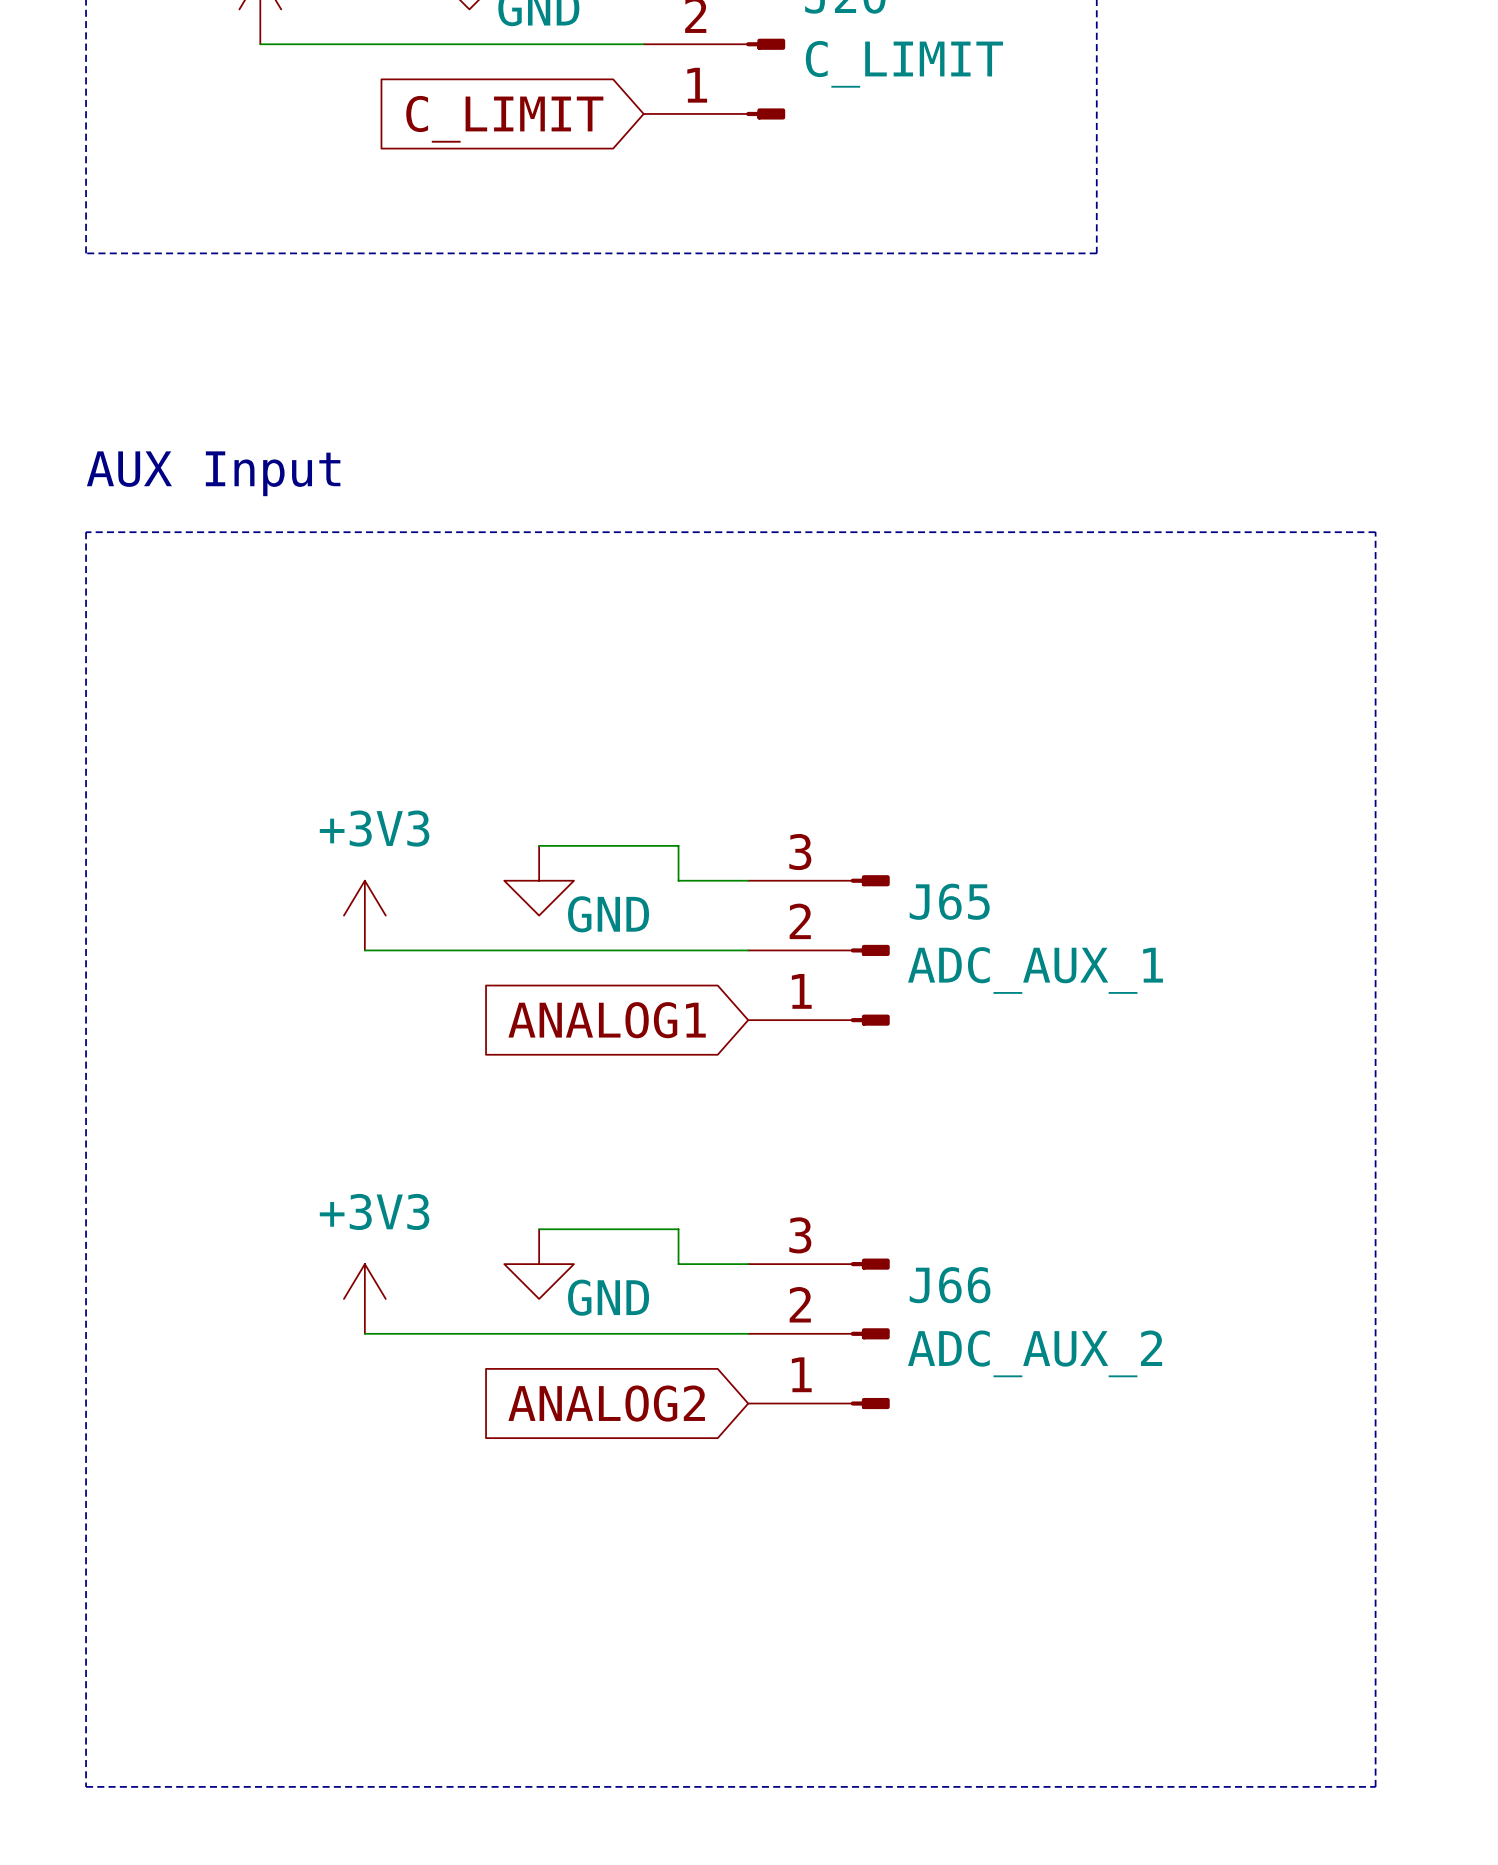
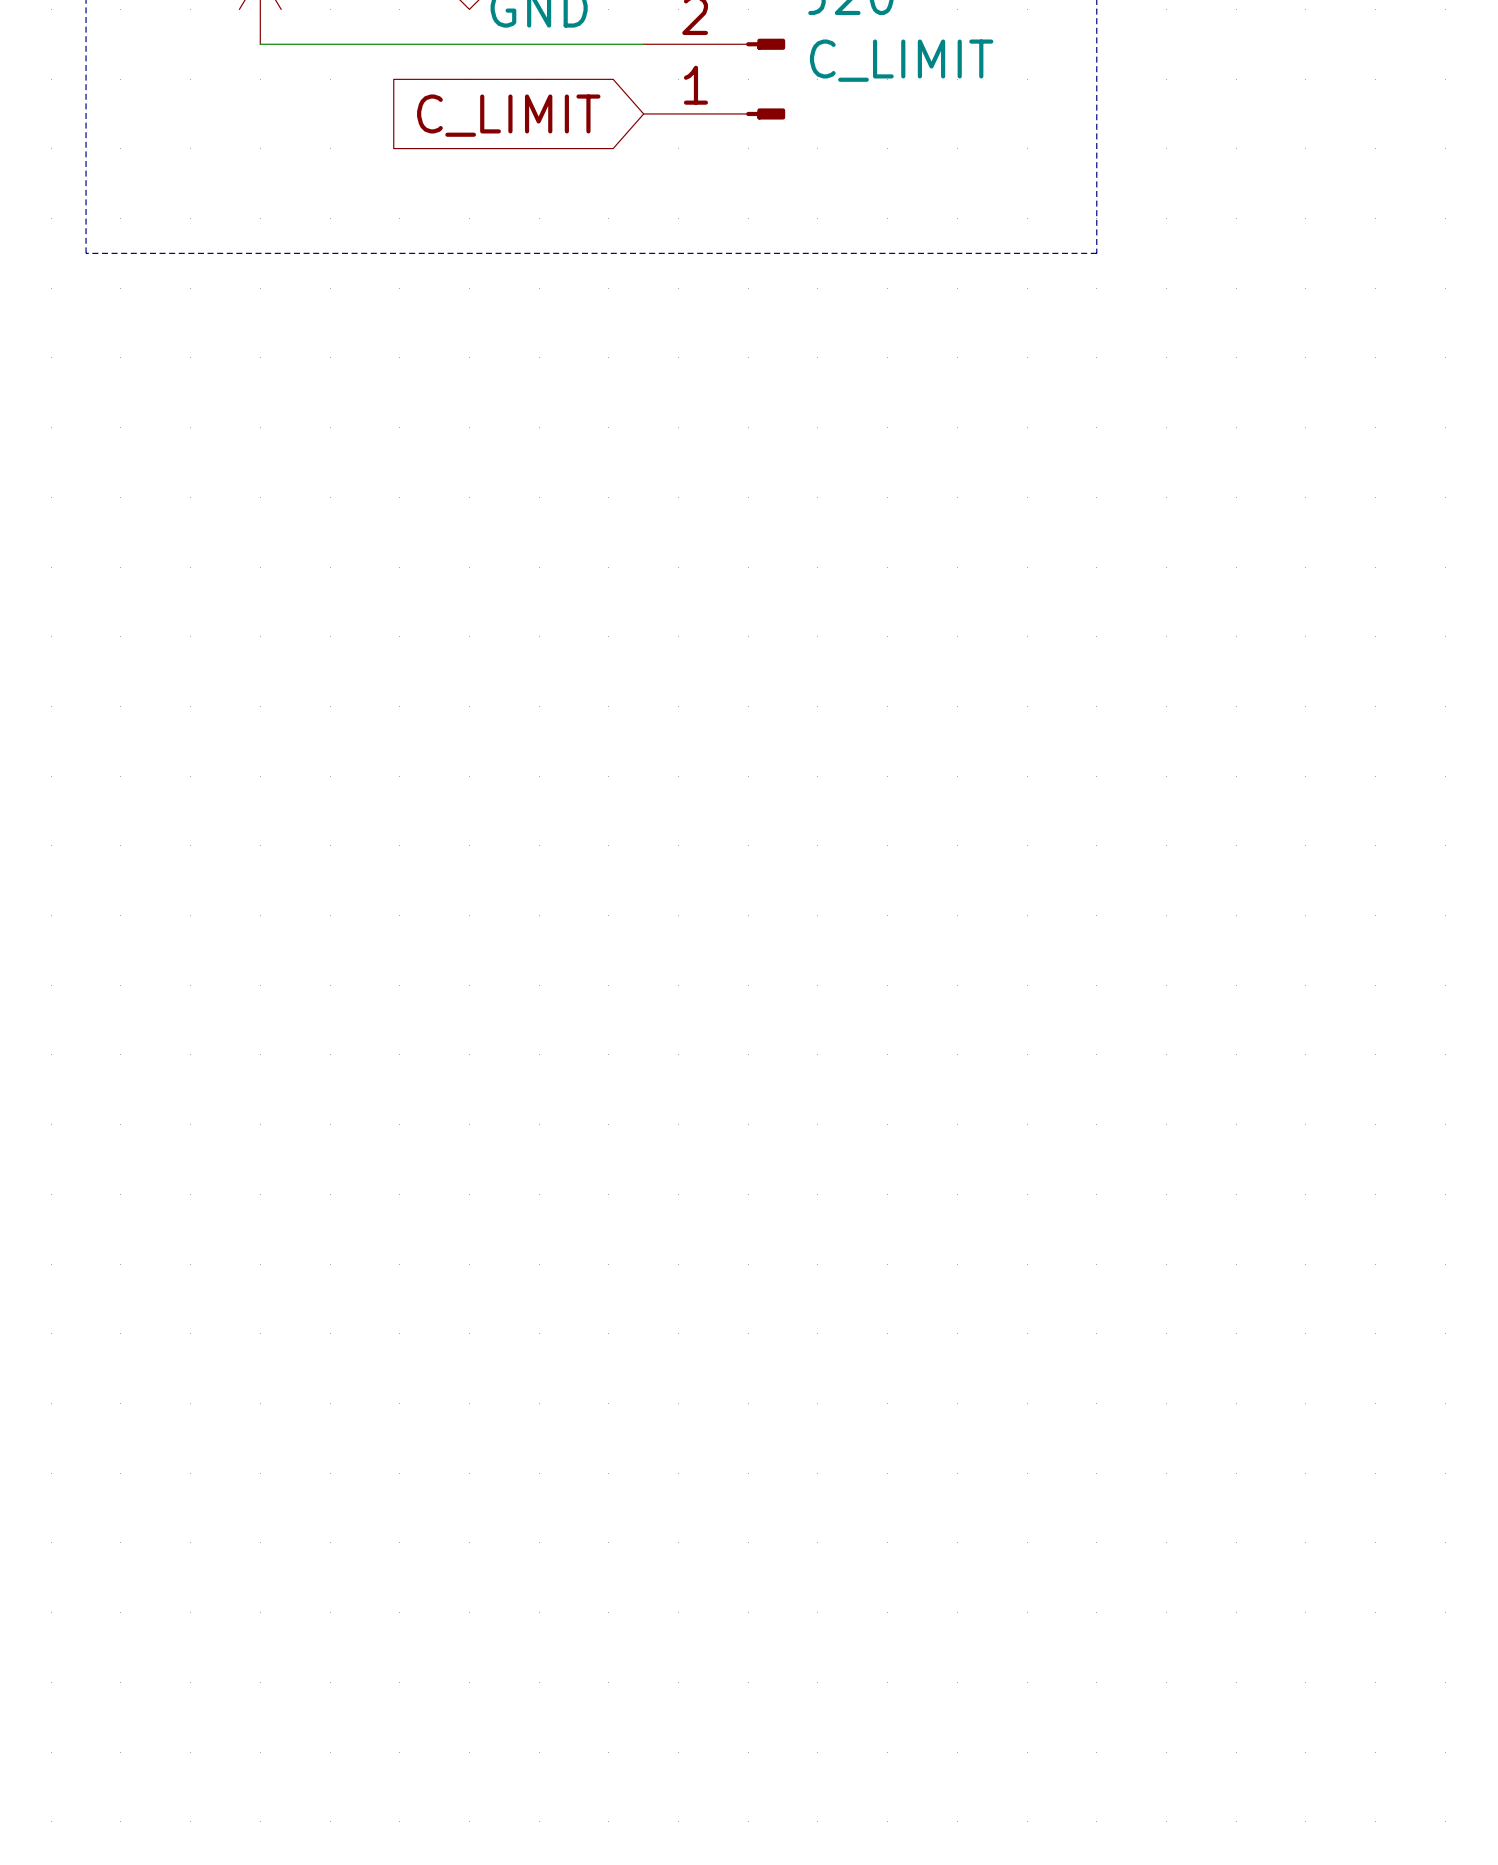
text: AUX Input (213, 473) -> none
line: (86, 532) (86, 1786) (1375, 1786) (1375, 532) (86, 532) -> none
wire: (539, 845) (678, 845) (678, 880) (748, 880) -> none
power symbol: GND (539, 880) -> none
power symbol: +3V3 (364, 915) -> none
wire: (364, 950) (748, 950) -> none
J65: ADC_AUX_1 (818, 950) -> none
global label: ANALOG1 (607, 1020) -> none
wire: (539, 1229) (678, 1229) (678, 1264) (748, 1264) -> none
power symbol: GND (539, 1264) -> none
power symbol: +3V3 (364, 1298) -> none
wire: (364, 1333) (748, 1333) -> none
J66: ADC_AUX_2 (818, 1333) -> none
global label: ANALOG2 (606, 1403) -> none

